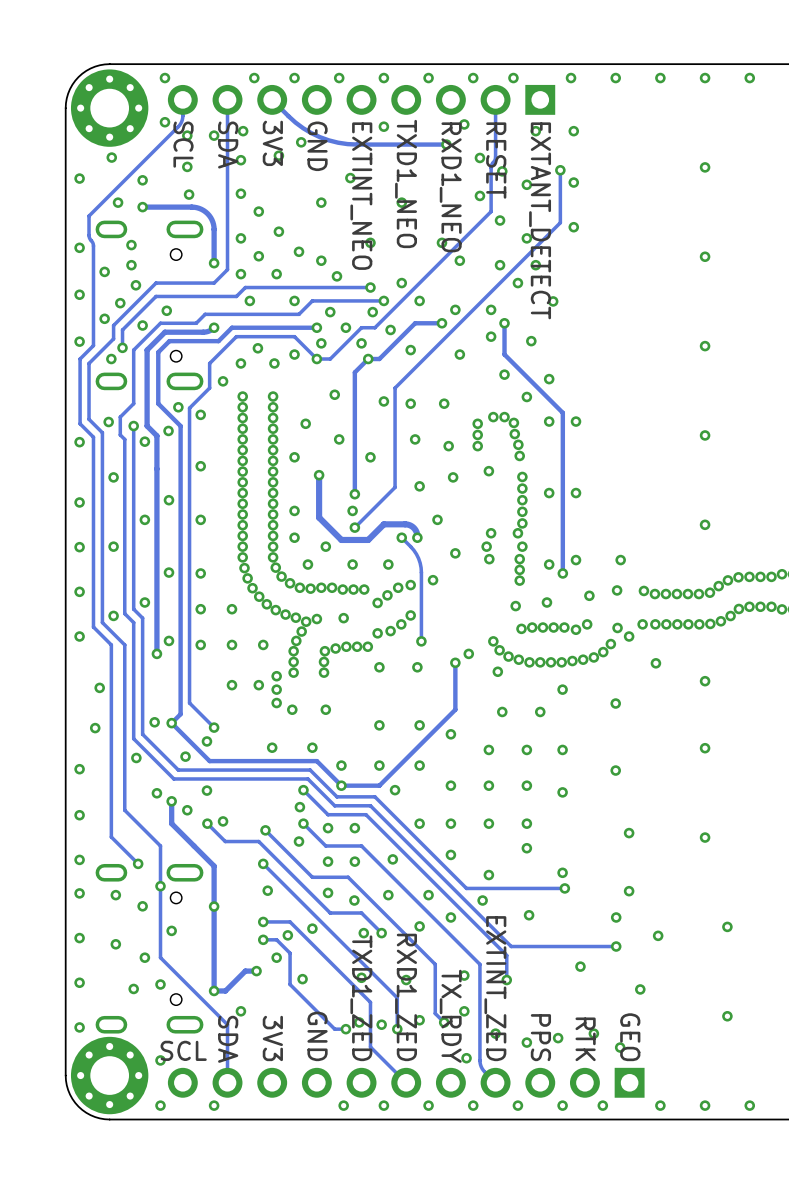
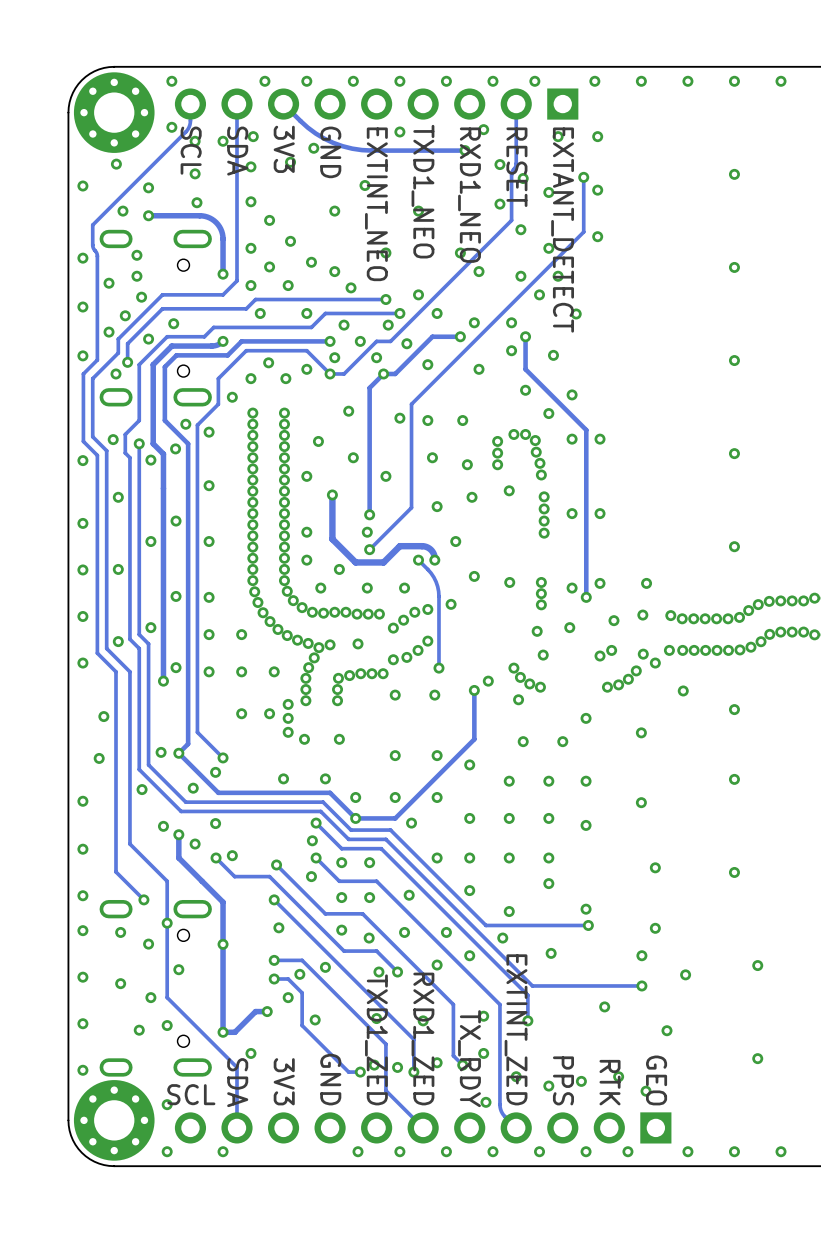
via: (522, 523) -> none
via: (491, 533) -> none
via: (517, 533) -> none
via: (486, 546) -> none
via: (522, 546) -> none
via: (532, 627) -> none
via: (542, 627) -> none
via: (553, 627) -> none
via: (564, 627) -> none
via: (572, 661) -> none
via: (529, 662) -> none
via: (540, 662) -> none
via: (550, 662) -> none
via: (561, 662) -> none

